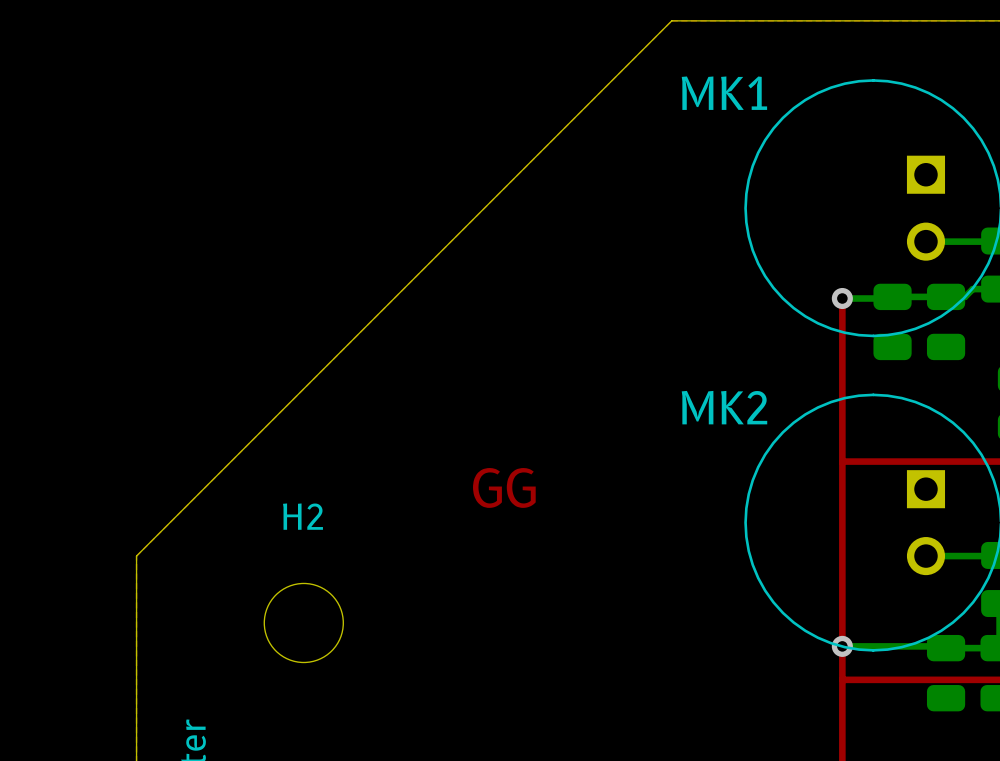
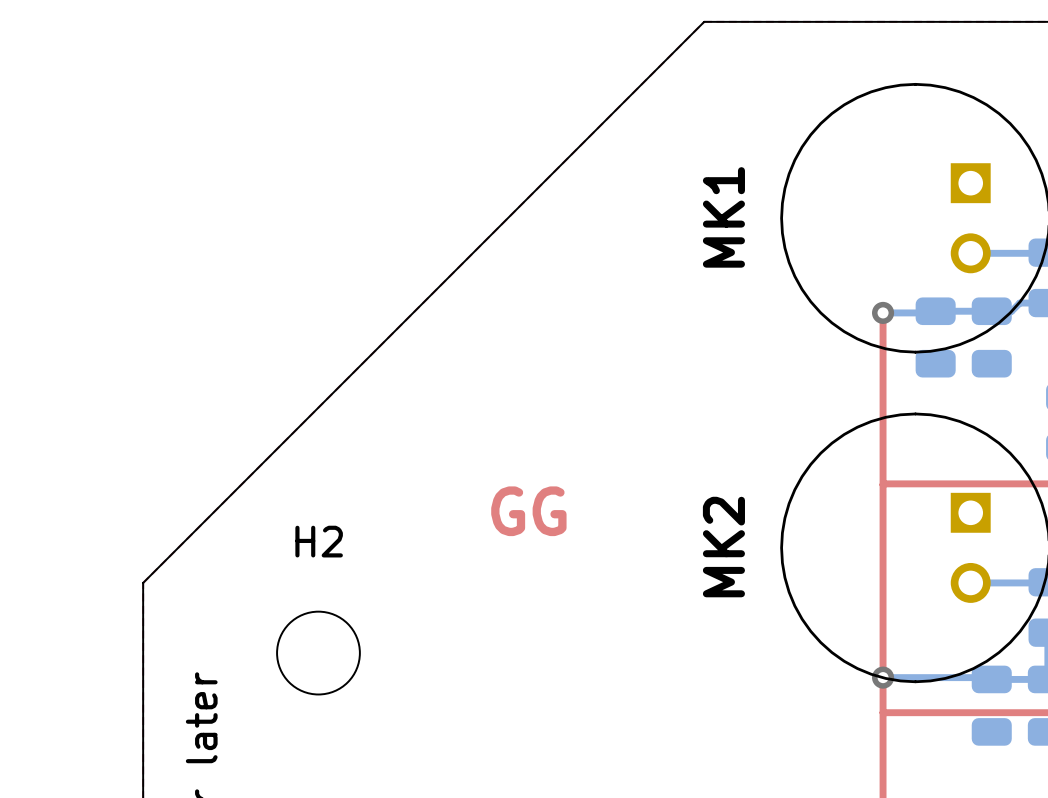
MK1 name rotation: 0° (724, 93) -> 90° counterclockwise (723, 217)
MK2 name rotation: 0° (724, 407) -> 90° counterclockwise (723, 547)

